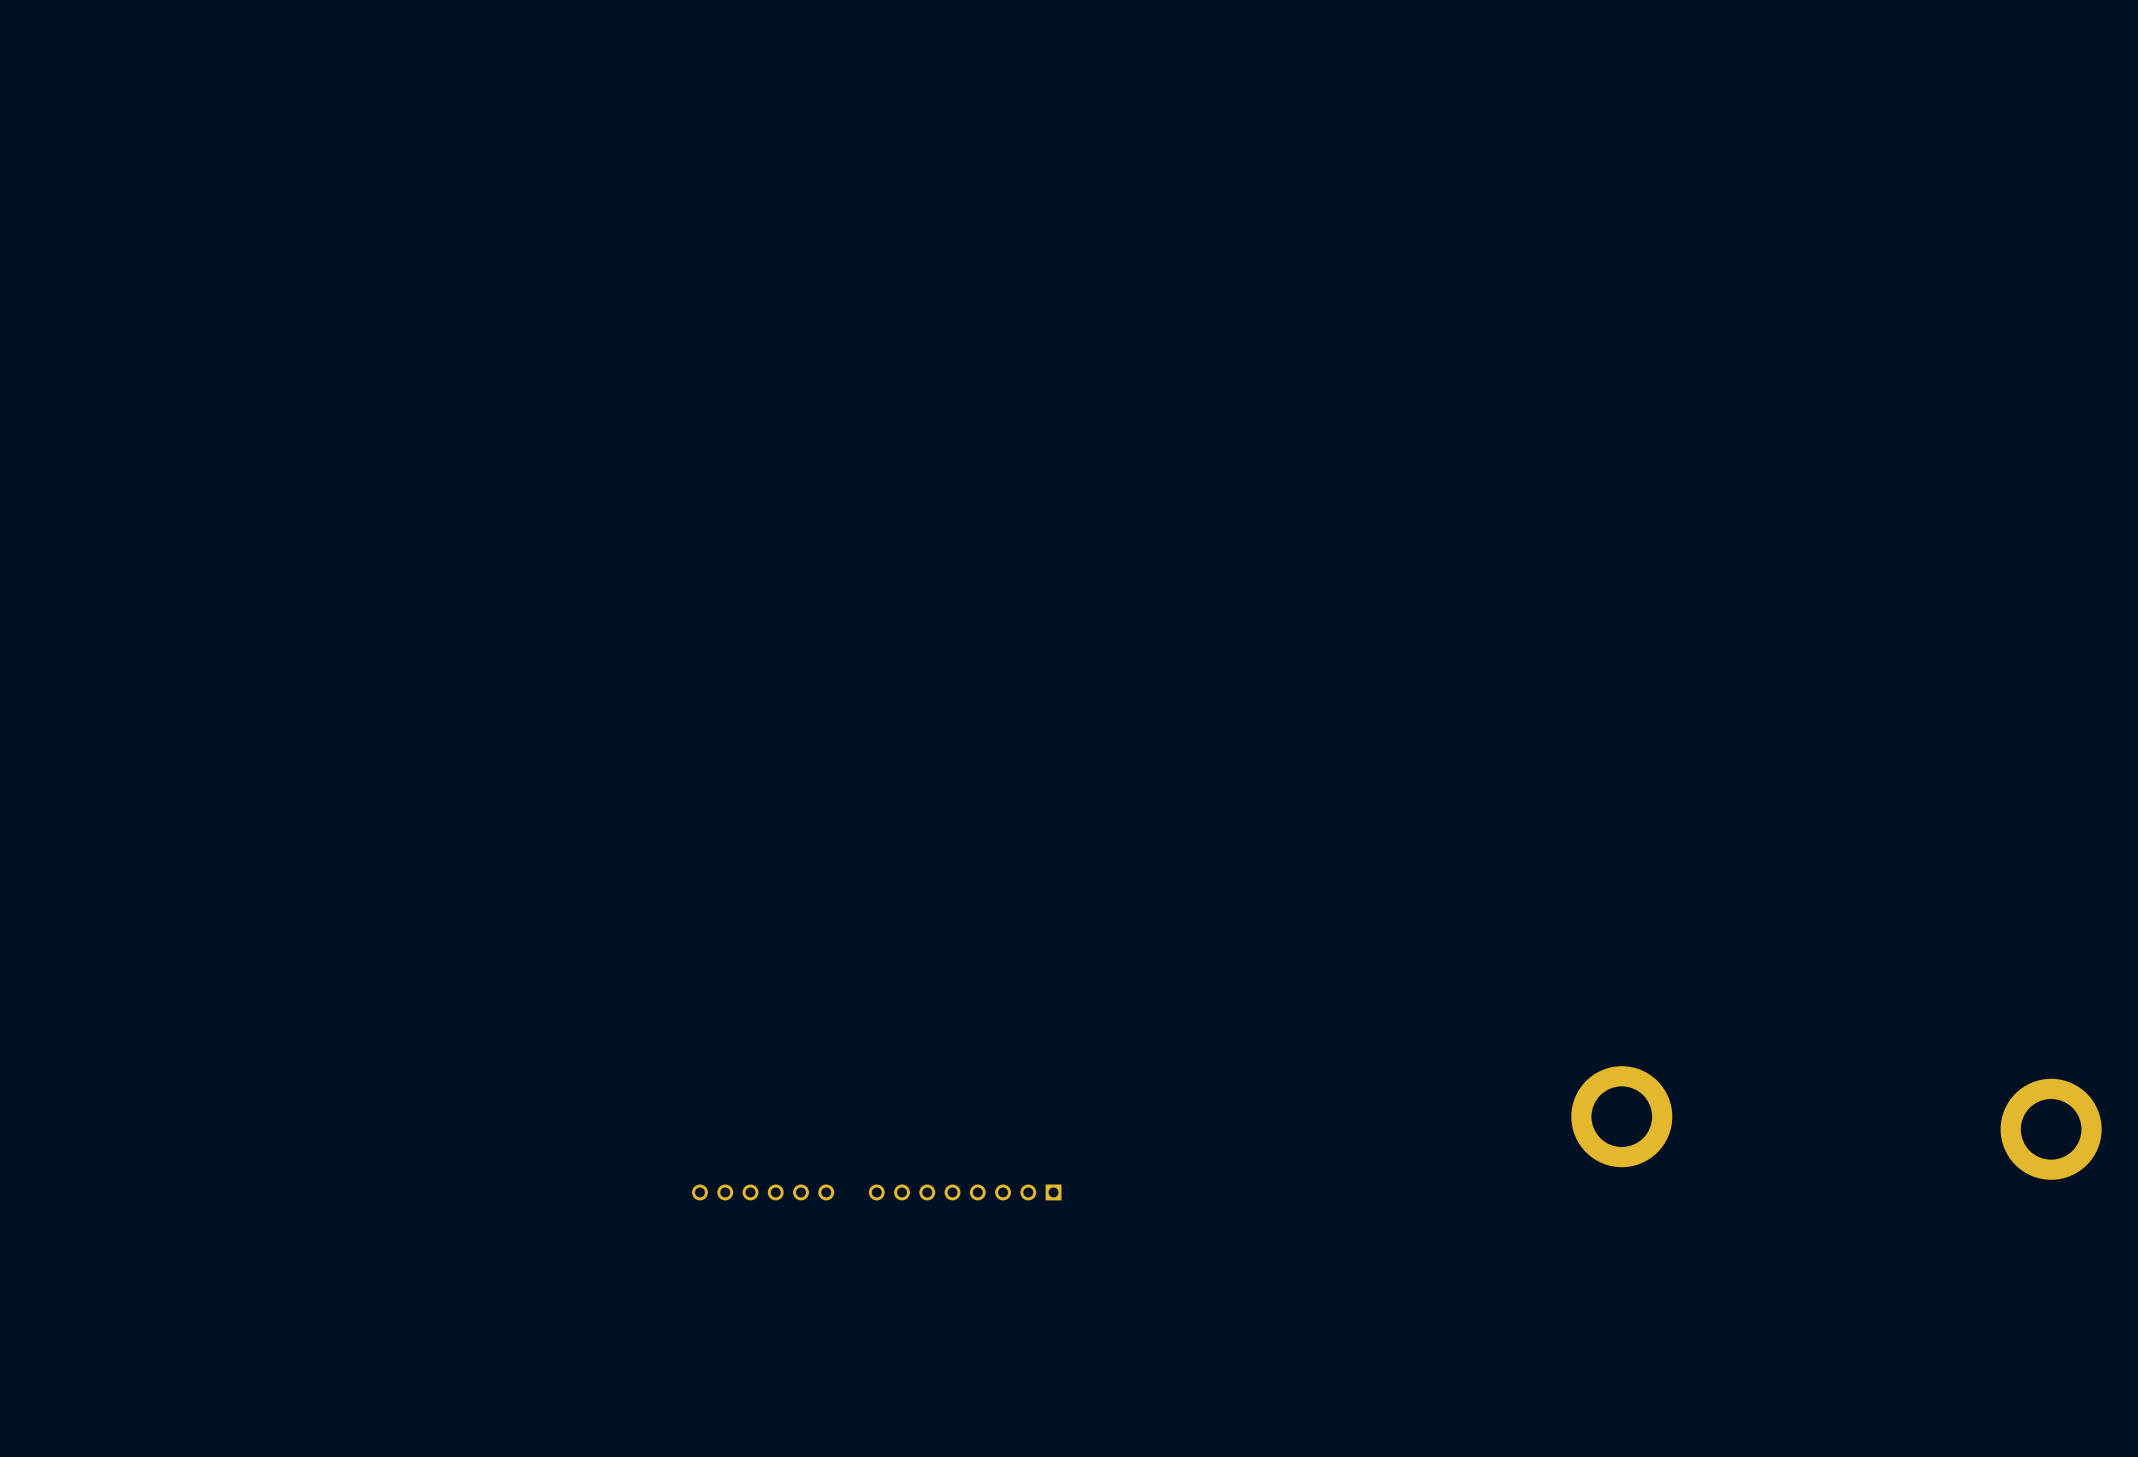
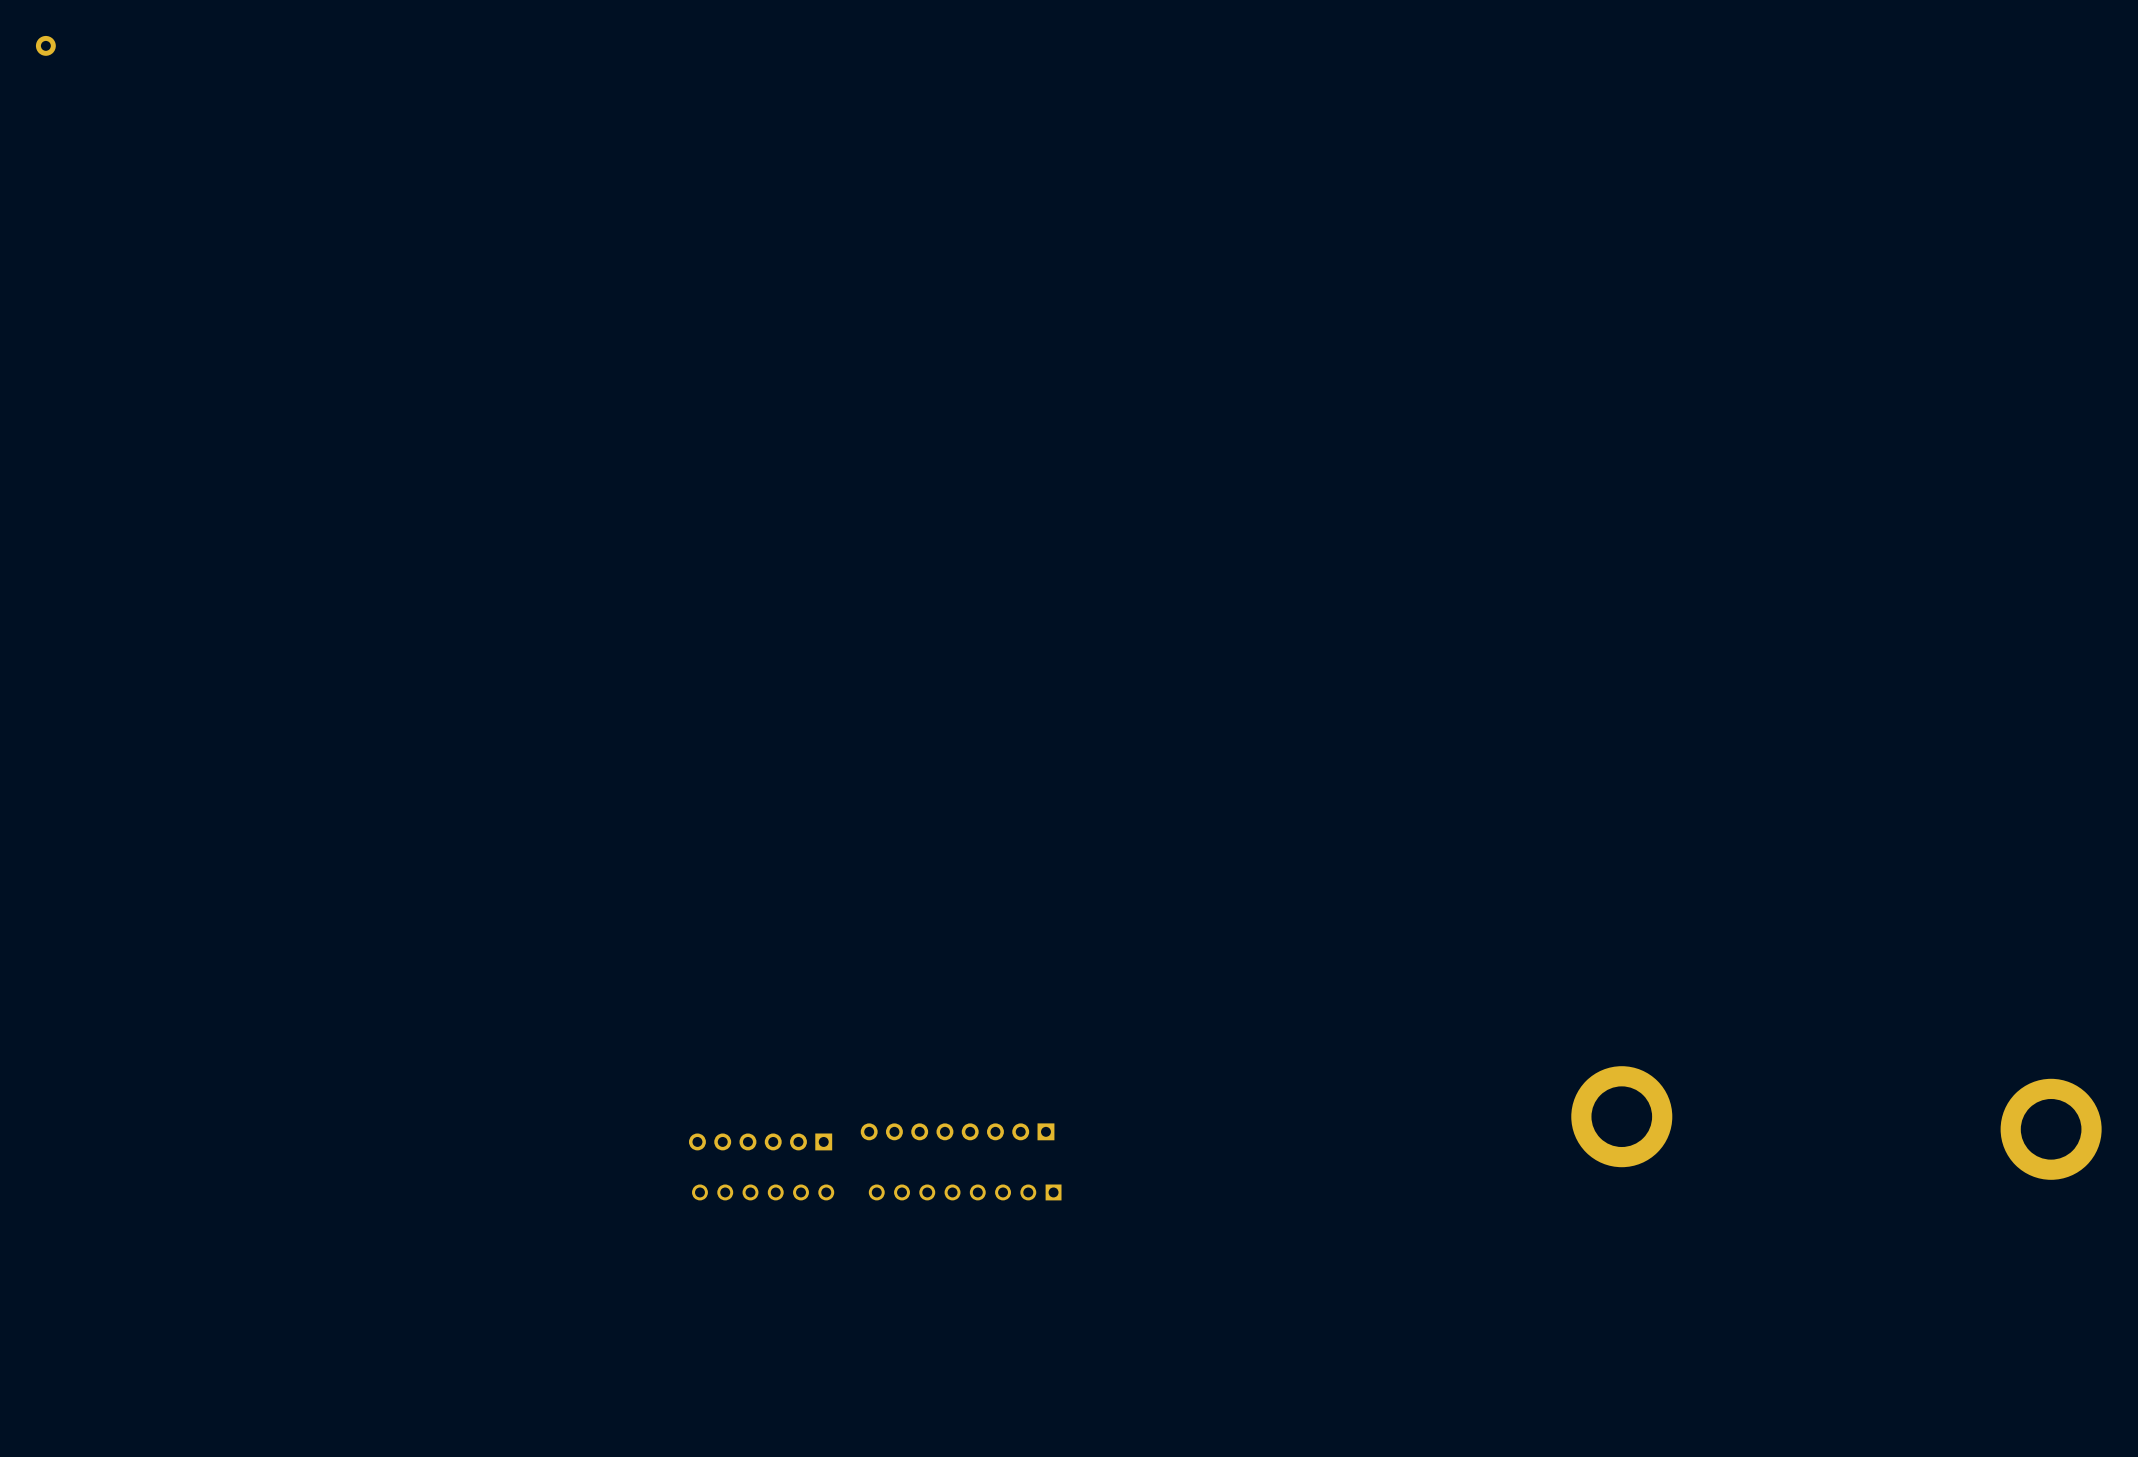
part: none -> (45, 45)
part: none -> (957, 1131)
part: none -> (760, 1141)

